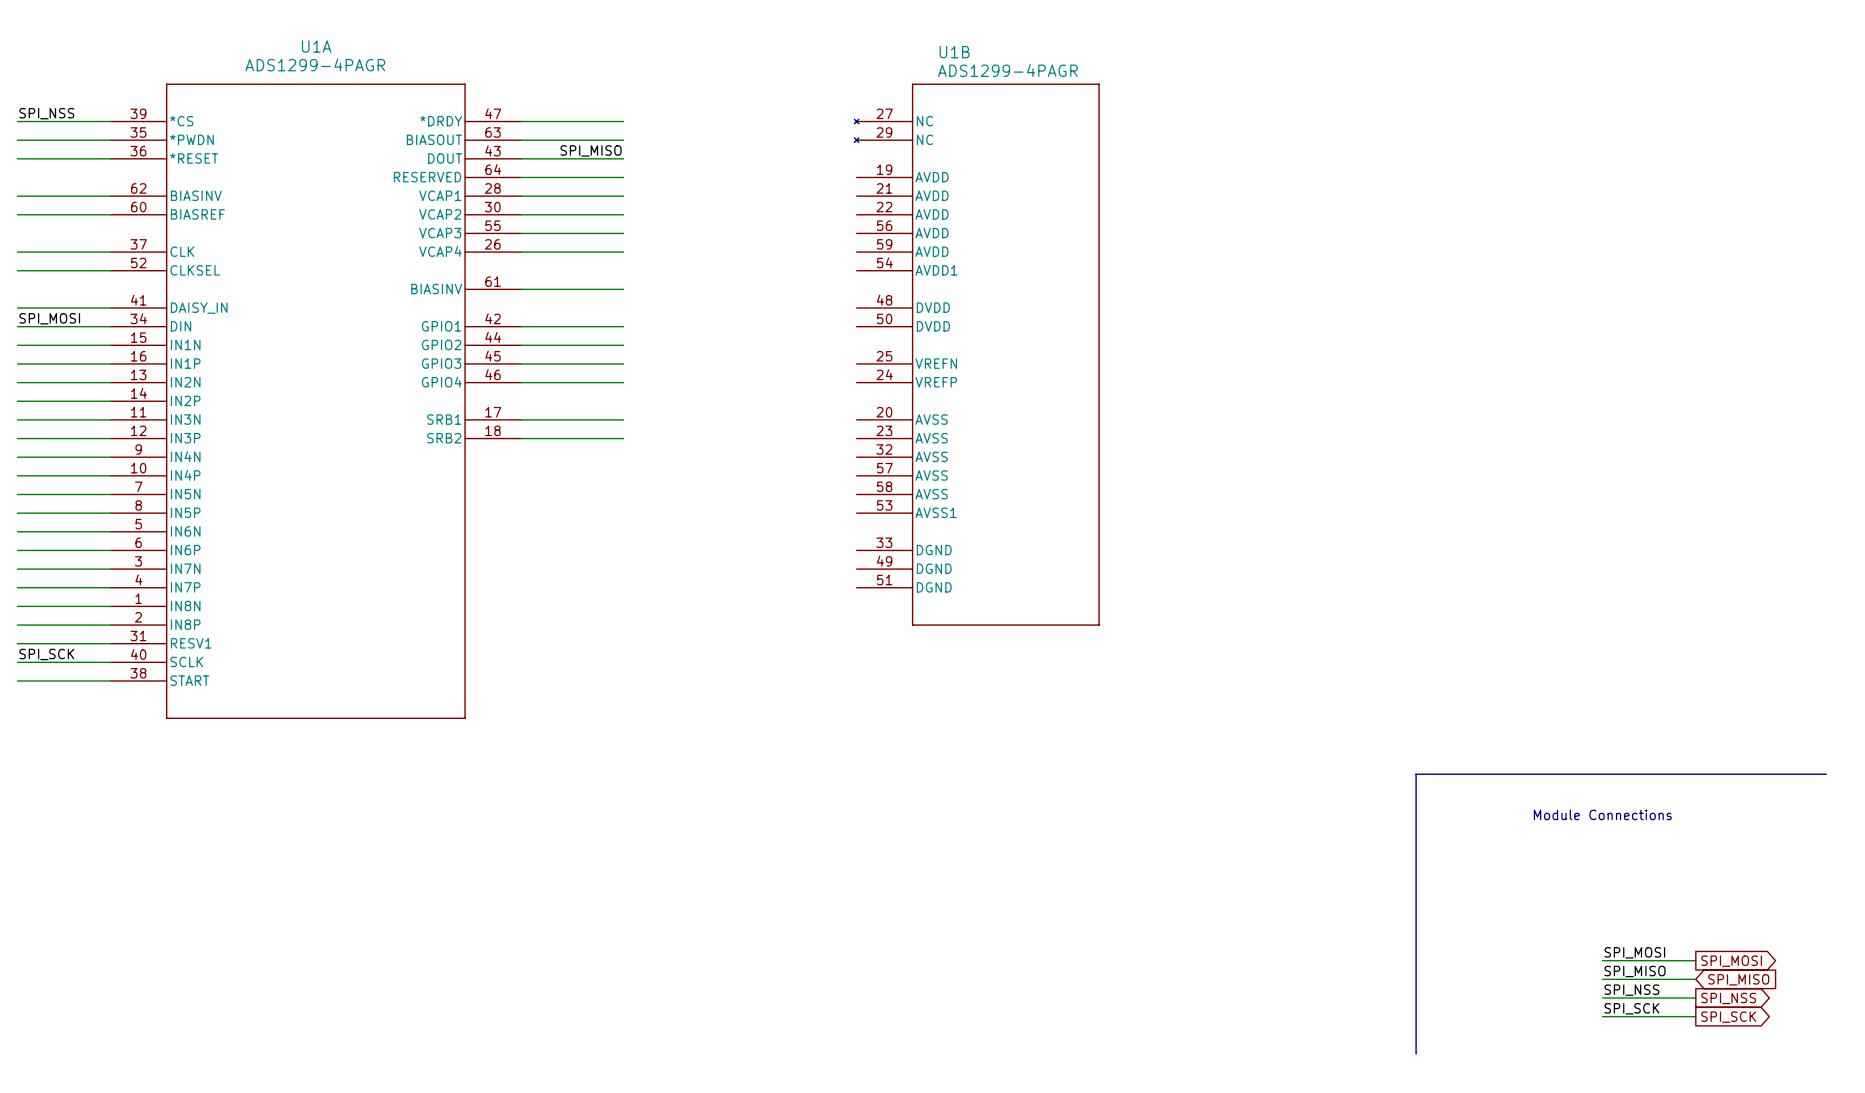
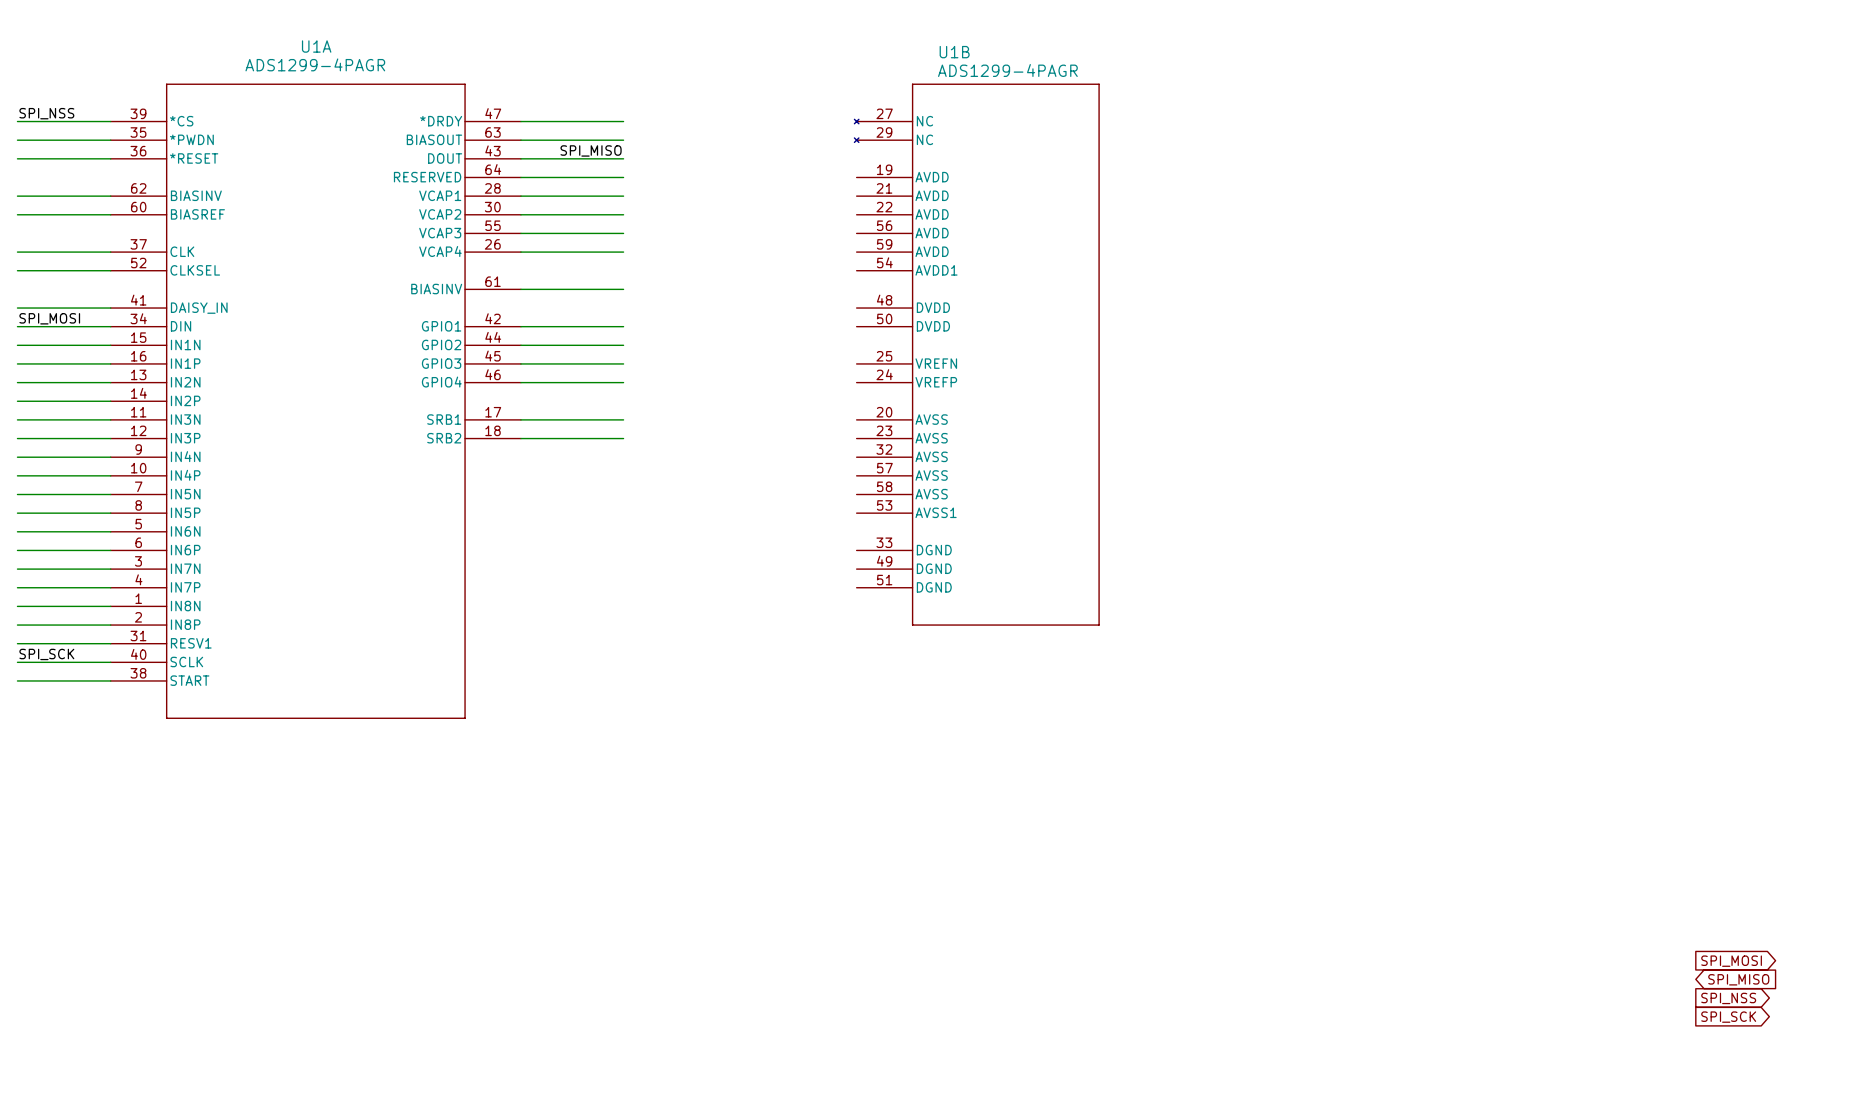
line: (1826, 774) (1416, 774) (1416, 1053) -> none
text: Module Connections (1602, 814) -> none
label: SPI_MOSI (1634, 952) -> none
wire: (1602, 960) (1695, 960) -> none
label: SPI_MISO (1635, 971) -> none
wire: (1602, 979) (1695, 979) -> none
label: SPI_NSS (1631, 990) -> none
wire: (1602, 998) (1695, 998) -> none
label: SPI_SCK (1631, 1008) -> none
wire: (1602, 1016) (1695, 1016) -> none

